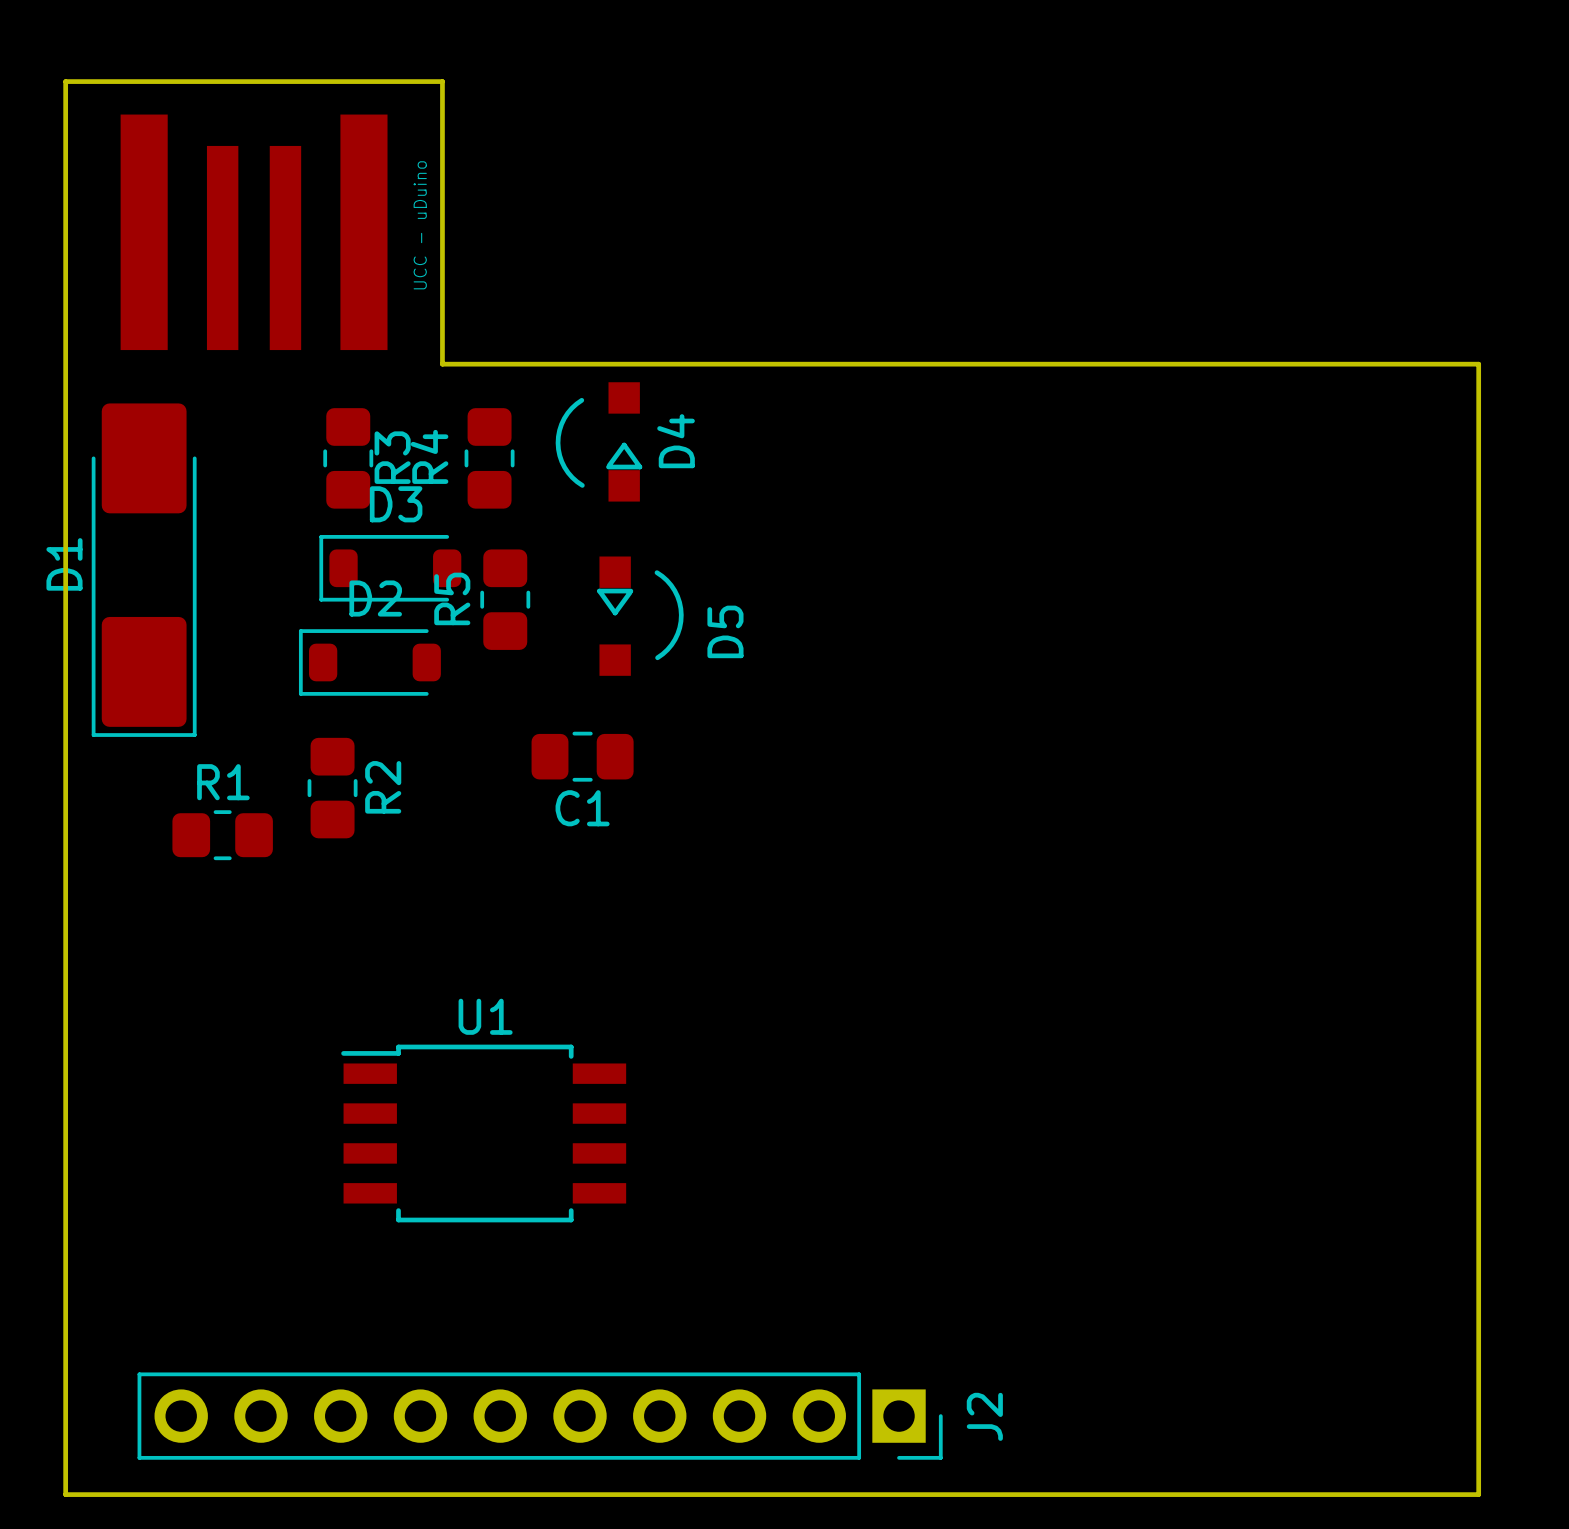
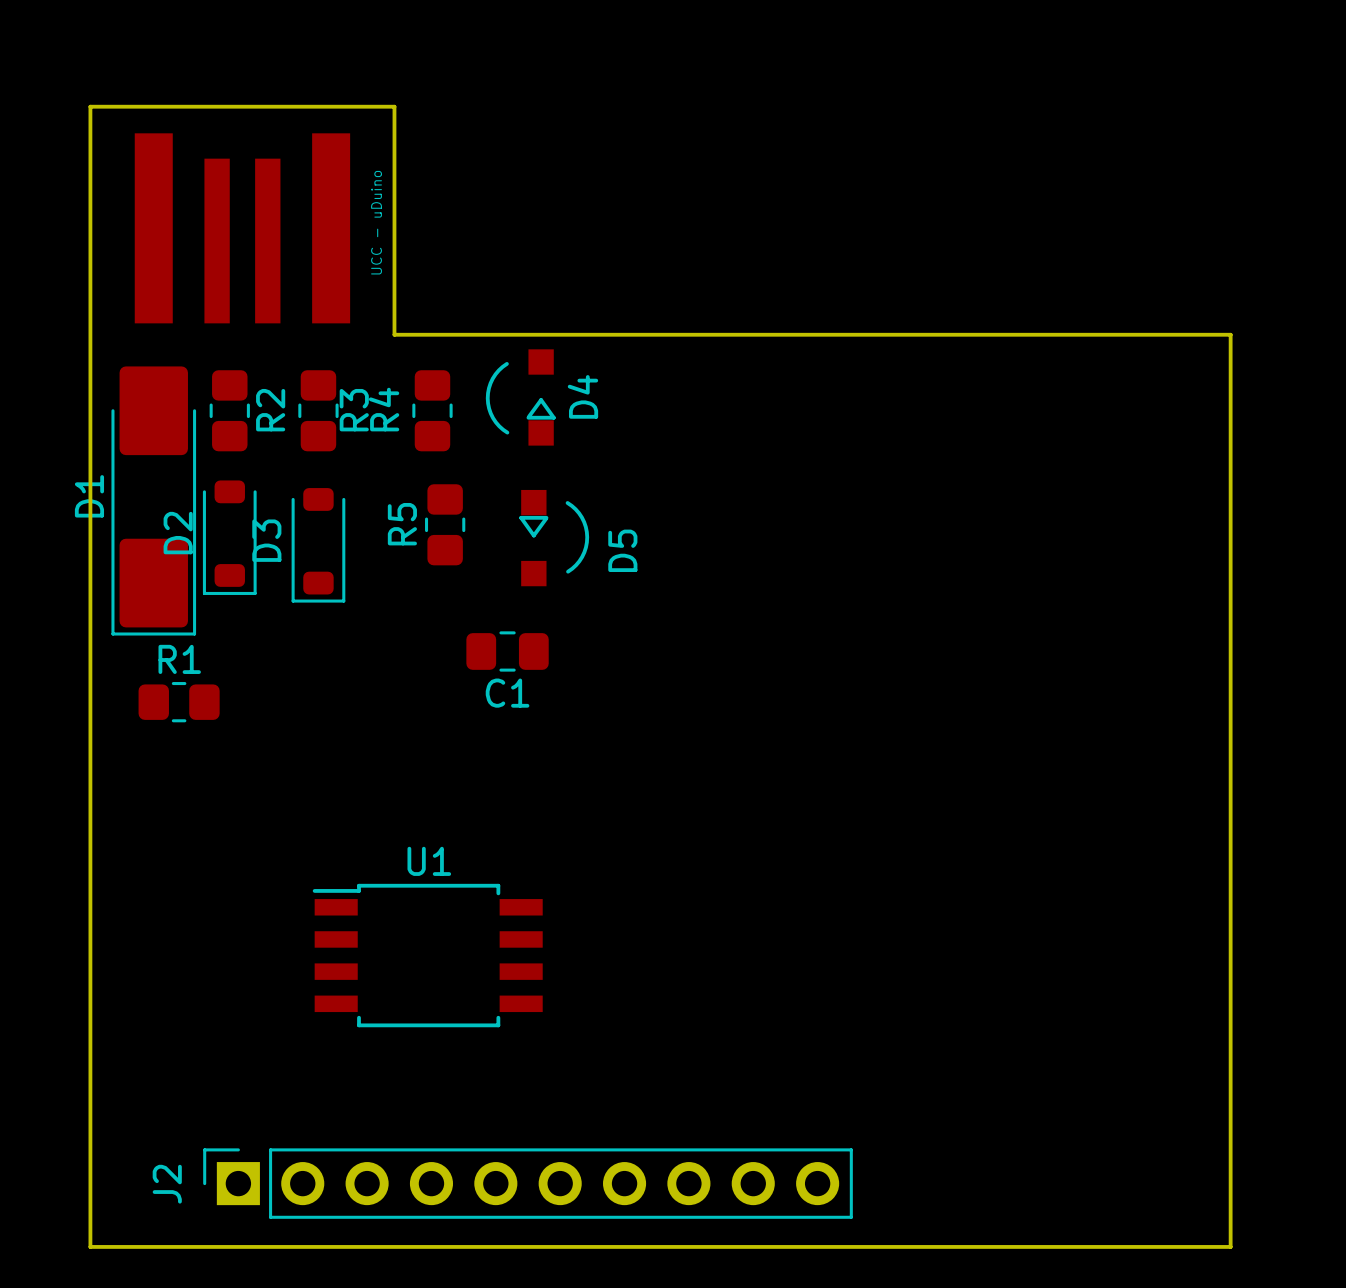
D3 rotation: 0° (390, 568) -> 90° counterclockwise (318, 545)
D2 rotation: 0° (369, 662) -> 90° counterclockwise (229, 537)
D2 position: (369, 662) -> (229, 537)
R2 position: (332, 788) -> (229, 410)
R1 position: (222, 835) -> (179, 702)
J2 rotation: 0° (540, 1416) -> 180° (528, 1183)

